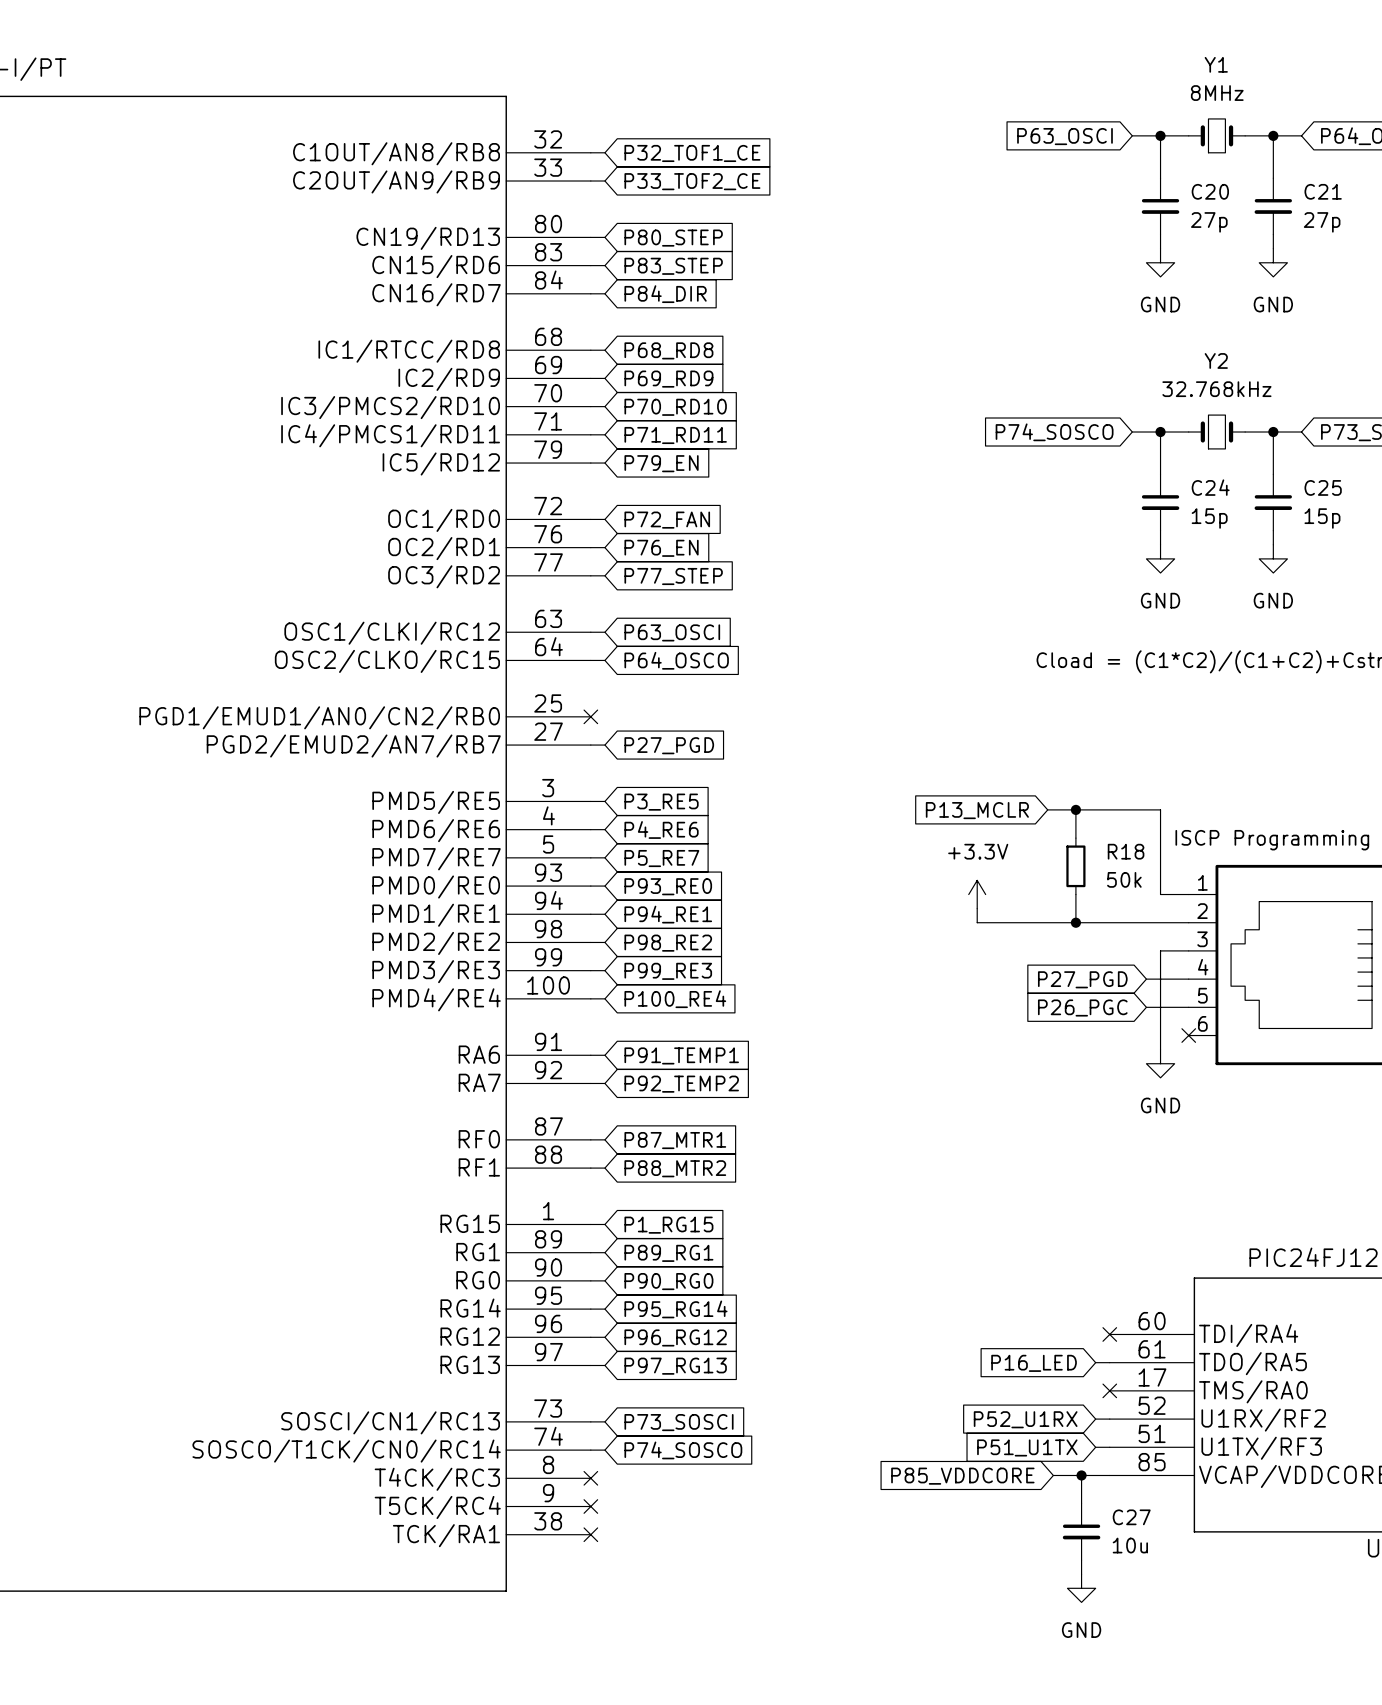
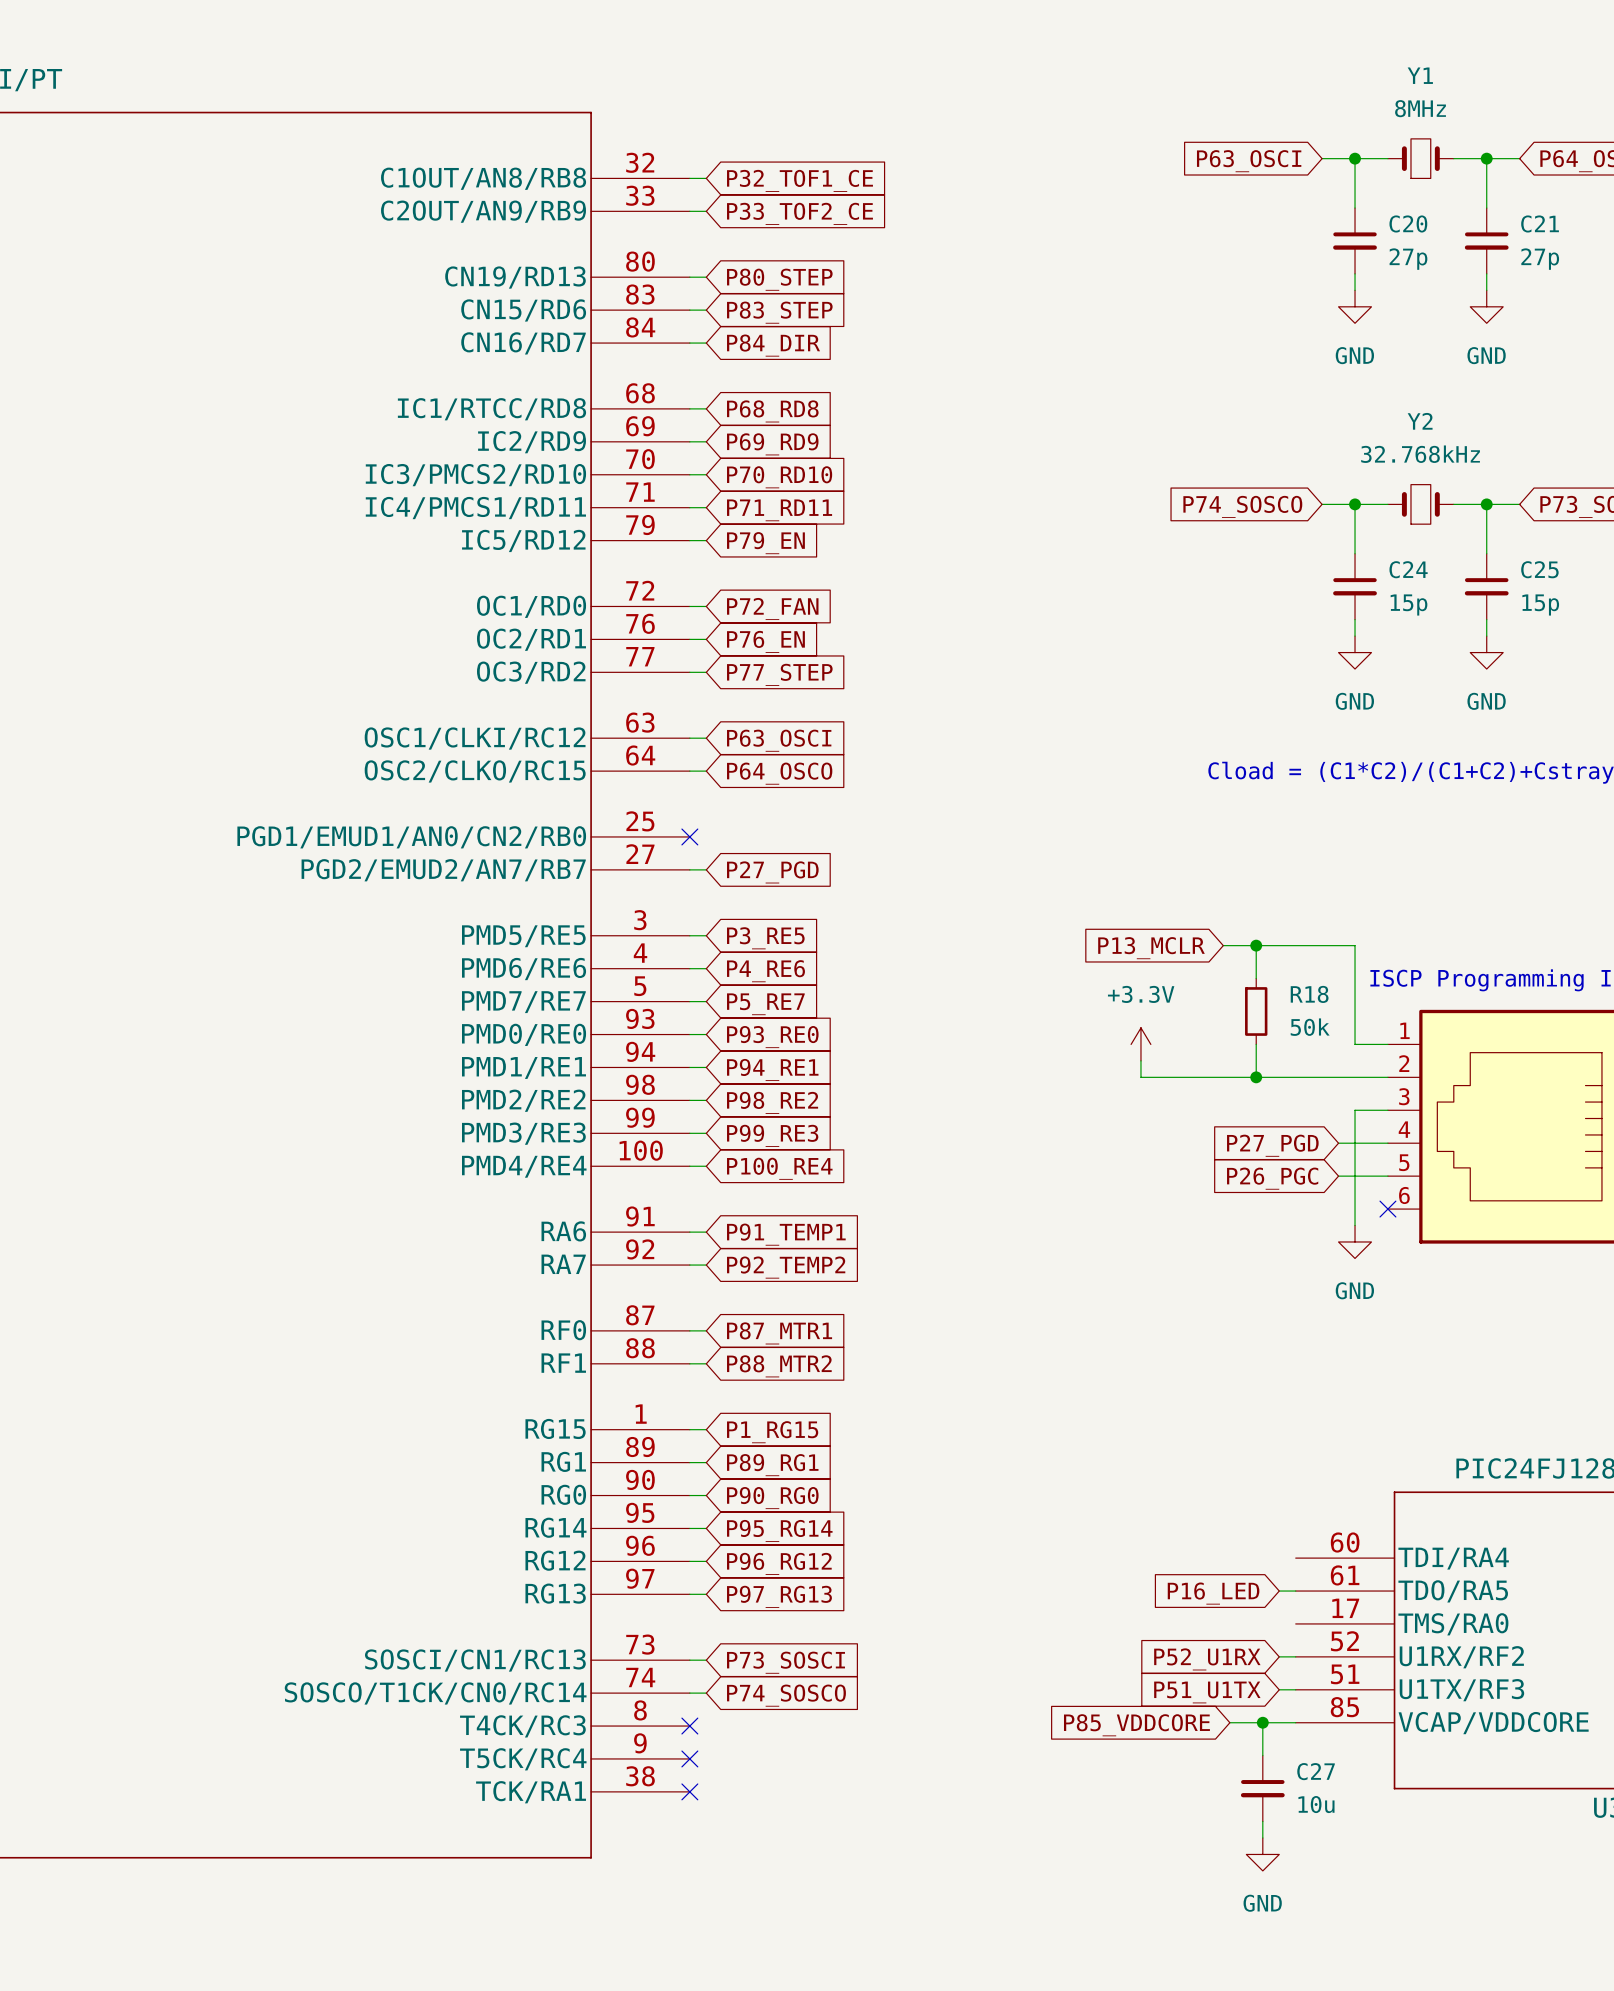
no-connect mark: (1109, 1334) -> none
no-connect mark: (1109, 1390) -> none

